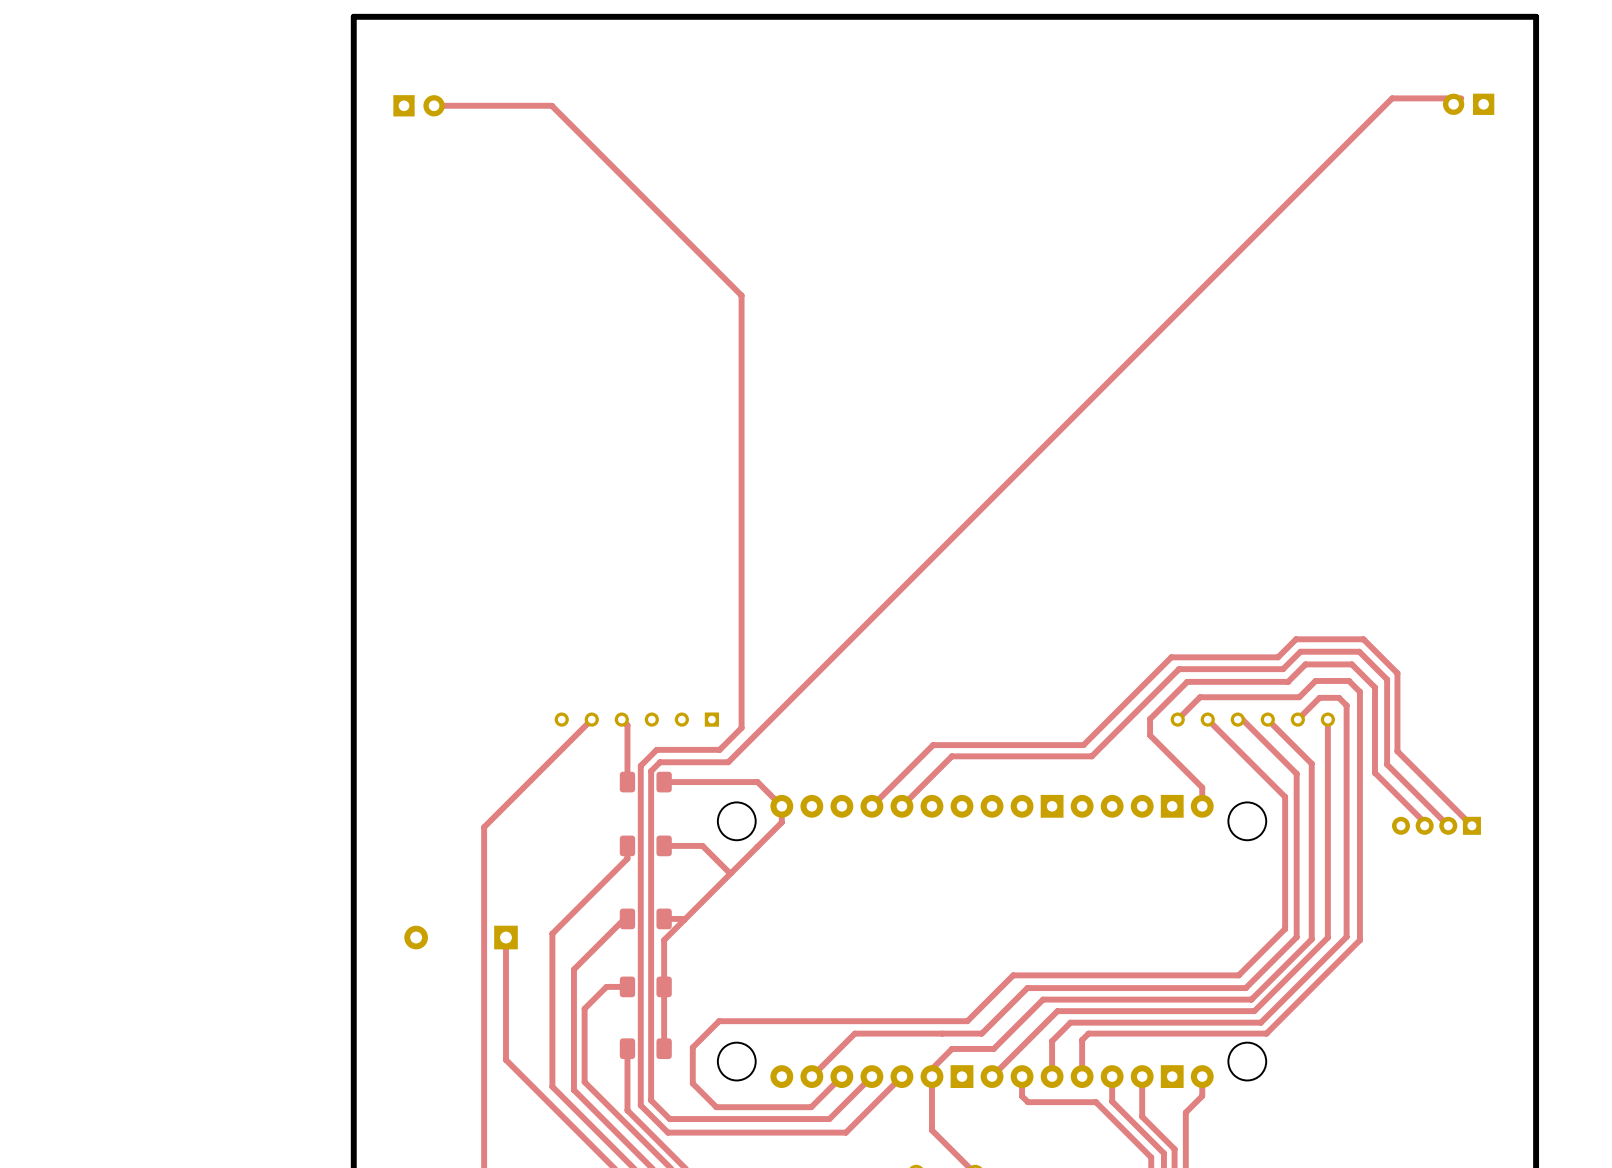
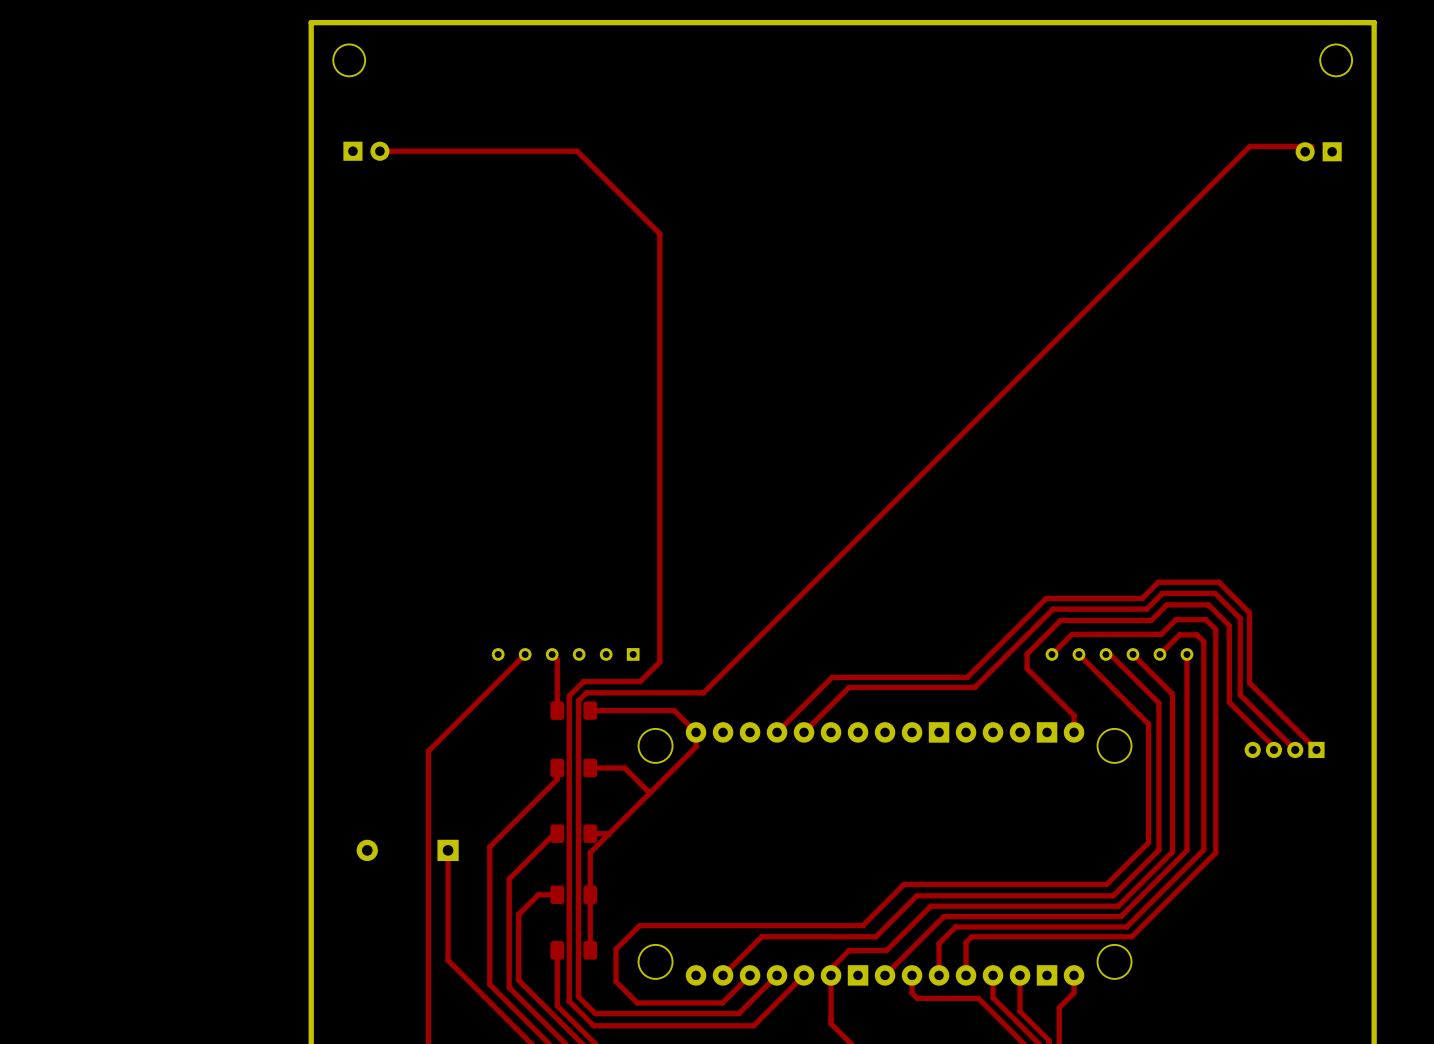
round board edge: none -> [333, 44, 366, 77]
round board edge: none -> [1319, 44, 1353, 77]
top track: (1461, 98) (1392, 98) (728, 762) -> (1312, 146) (1249, 146) (703, 692) (647, 692)
part position: (1468, 104) -> (1318, 151)
part position: (419, 105) -> (366, 151)
top track: (439, 105) (551, 105) (741, 295) -> (379, 151) (577, 151) (659, 233) (659, 273)

